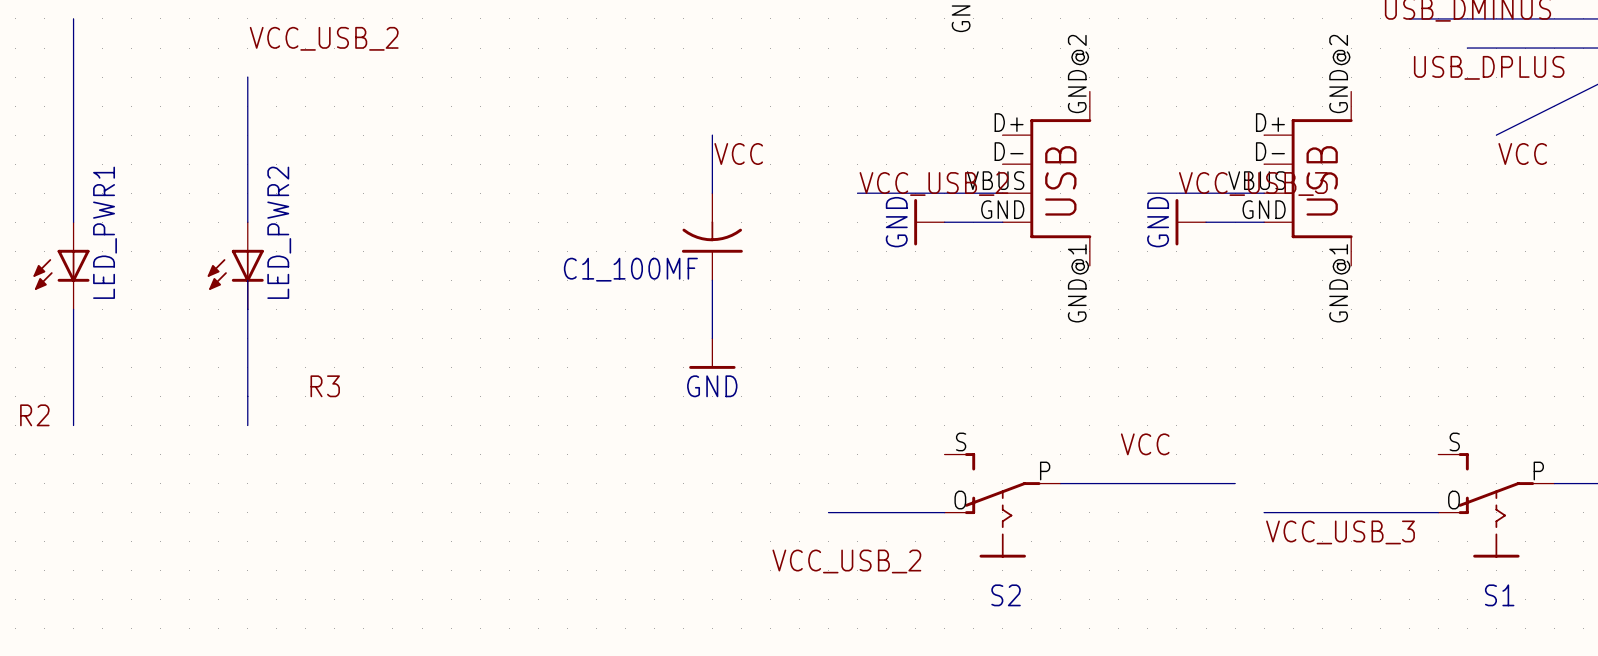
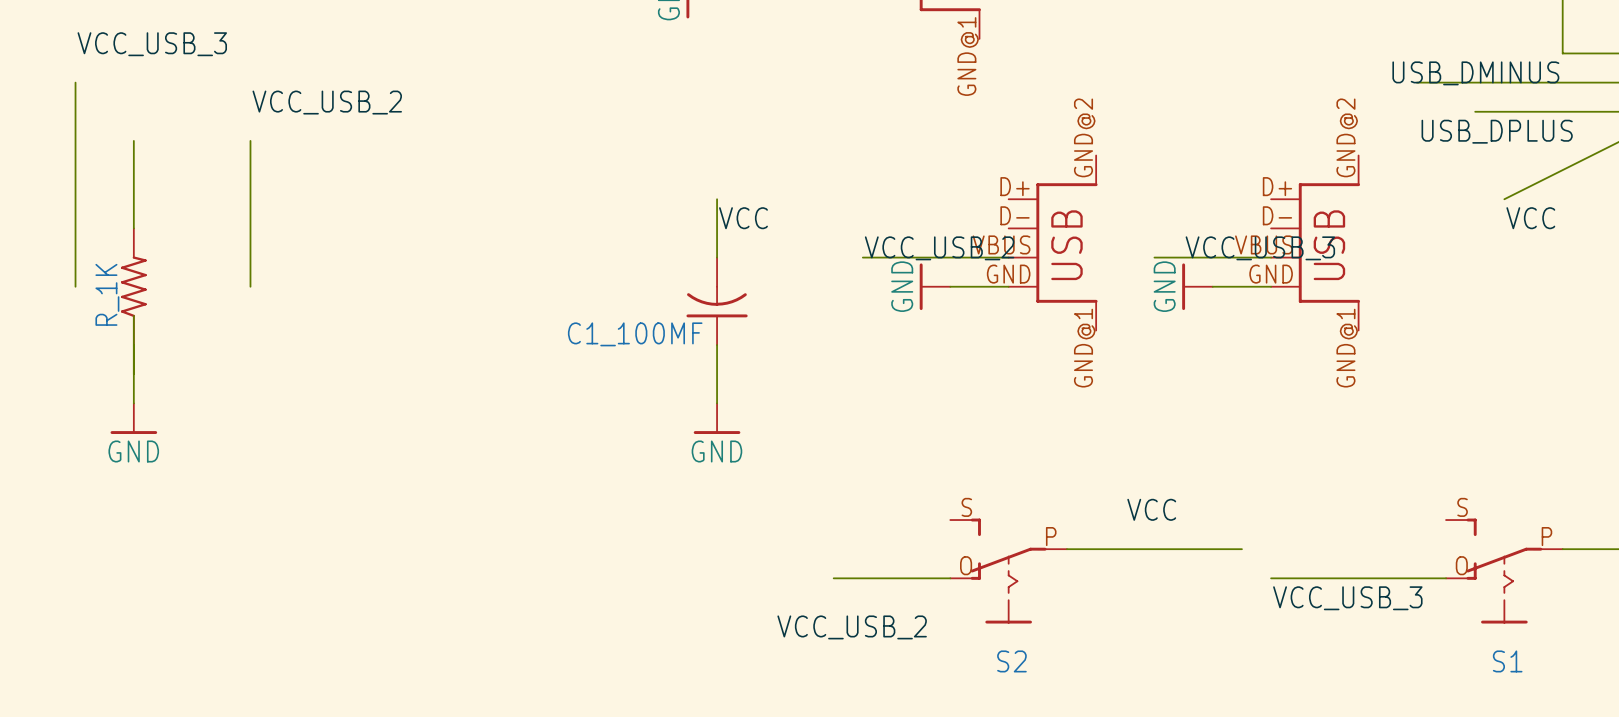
wire: none -> (133, 140) (133, 228)
R_1K: none -> (133, 286)
wire: none -> (133, 315) (133, 403)
LED_PWR1: (61, 265) -> none
LED_PWR2: (235, 265) -> none
wire: (247, 280) (247, 425) -> none
wire: (73, 309) (73, 425) -> none
power symbol: none -> GND (133, 418)
label: R3 (325, 386) -> none
label: R2 (34, 415) -> none

